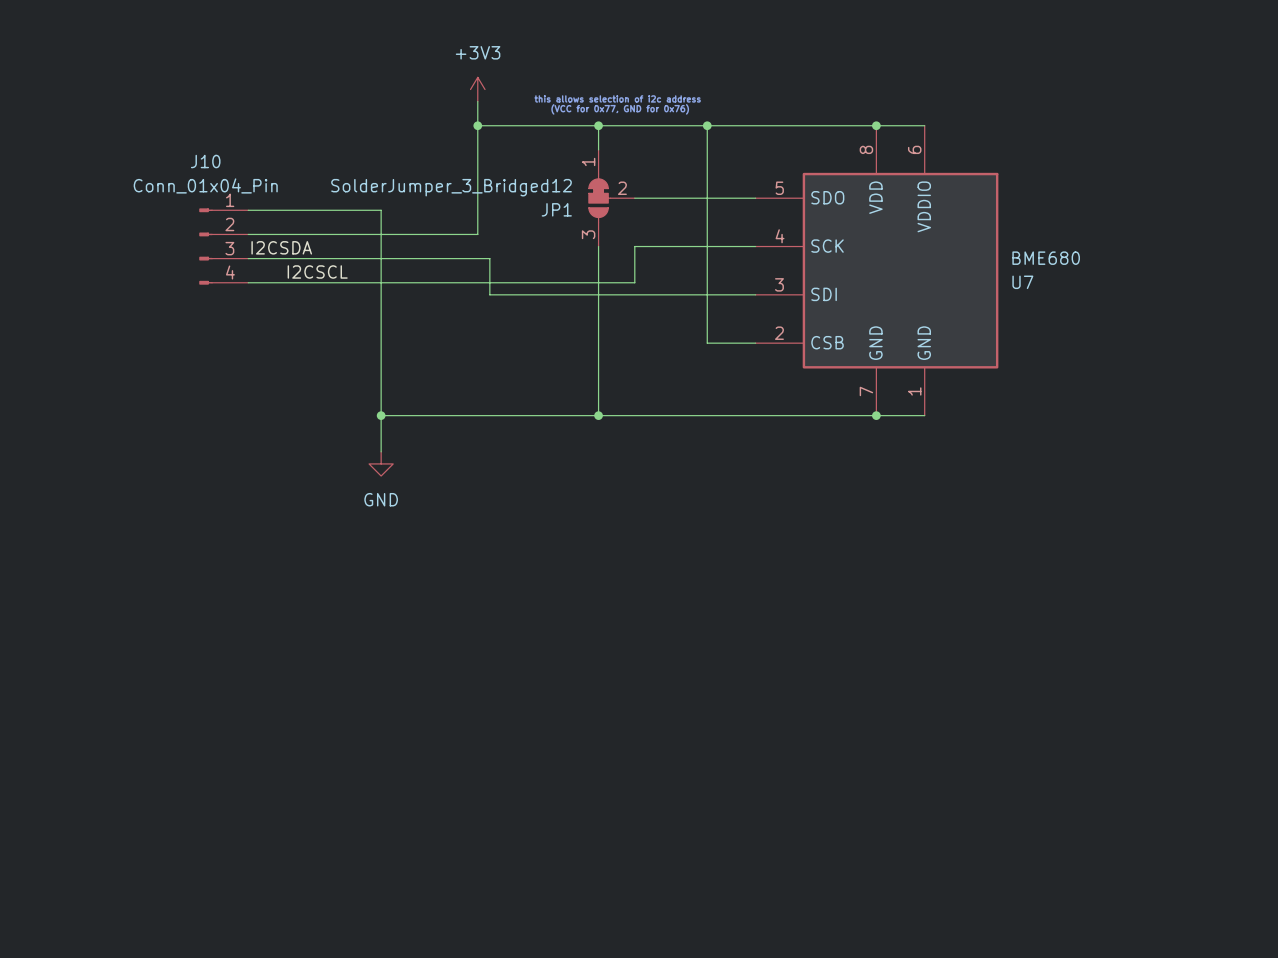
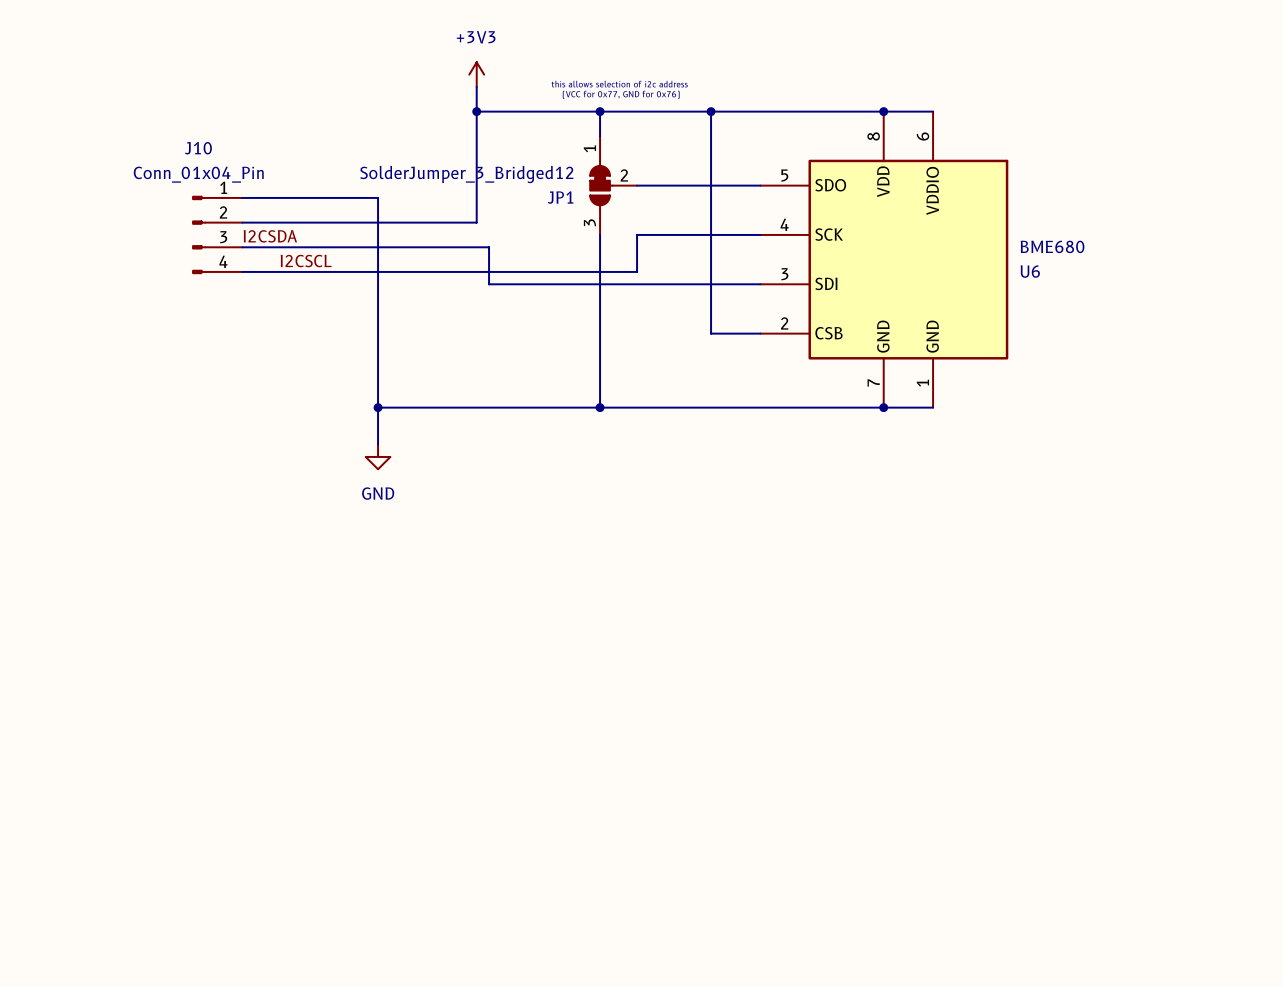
U7 name: U7 (1022, 282) -> U6 (1030, 271)

